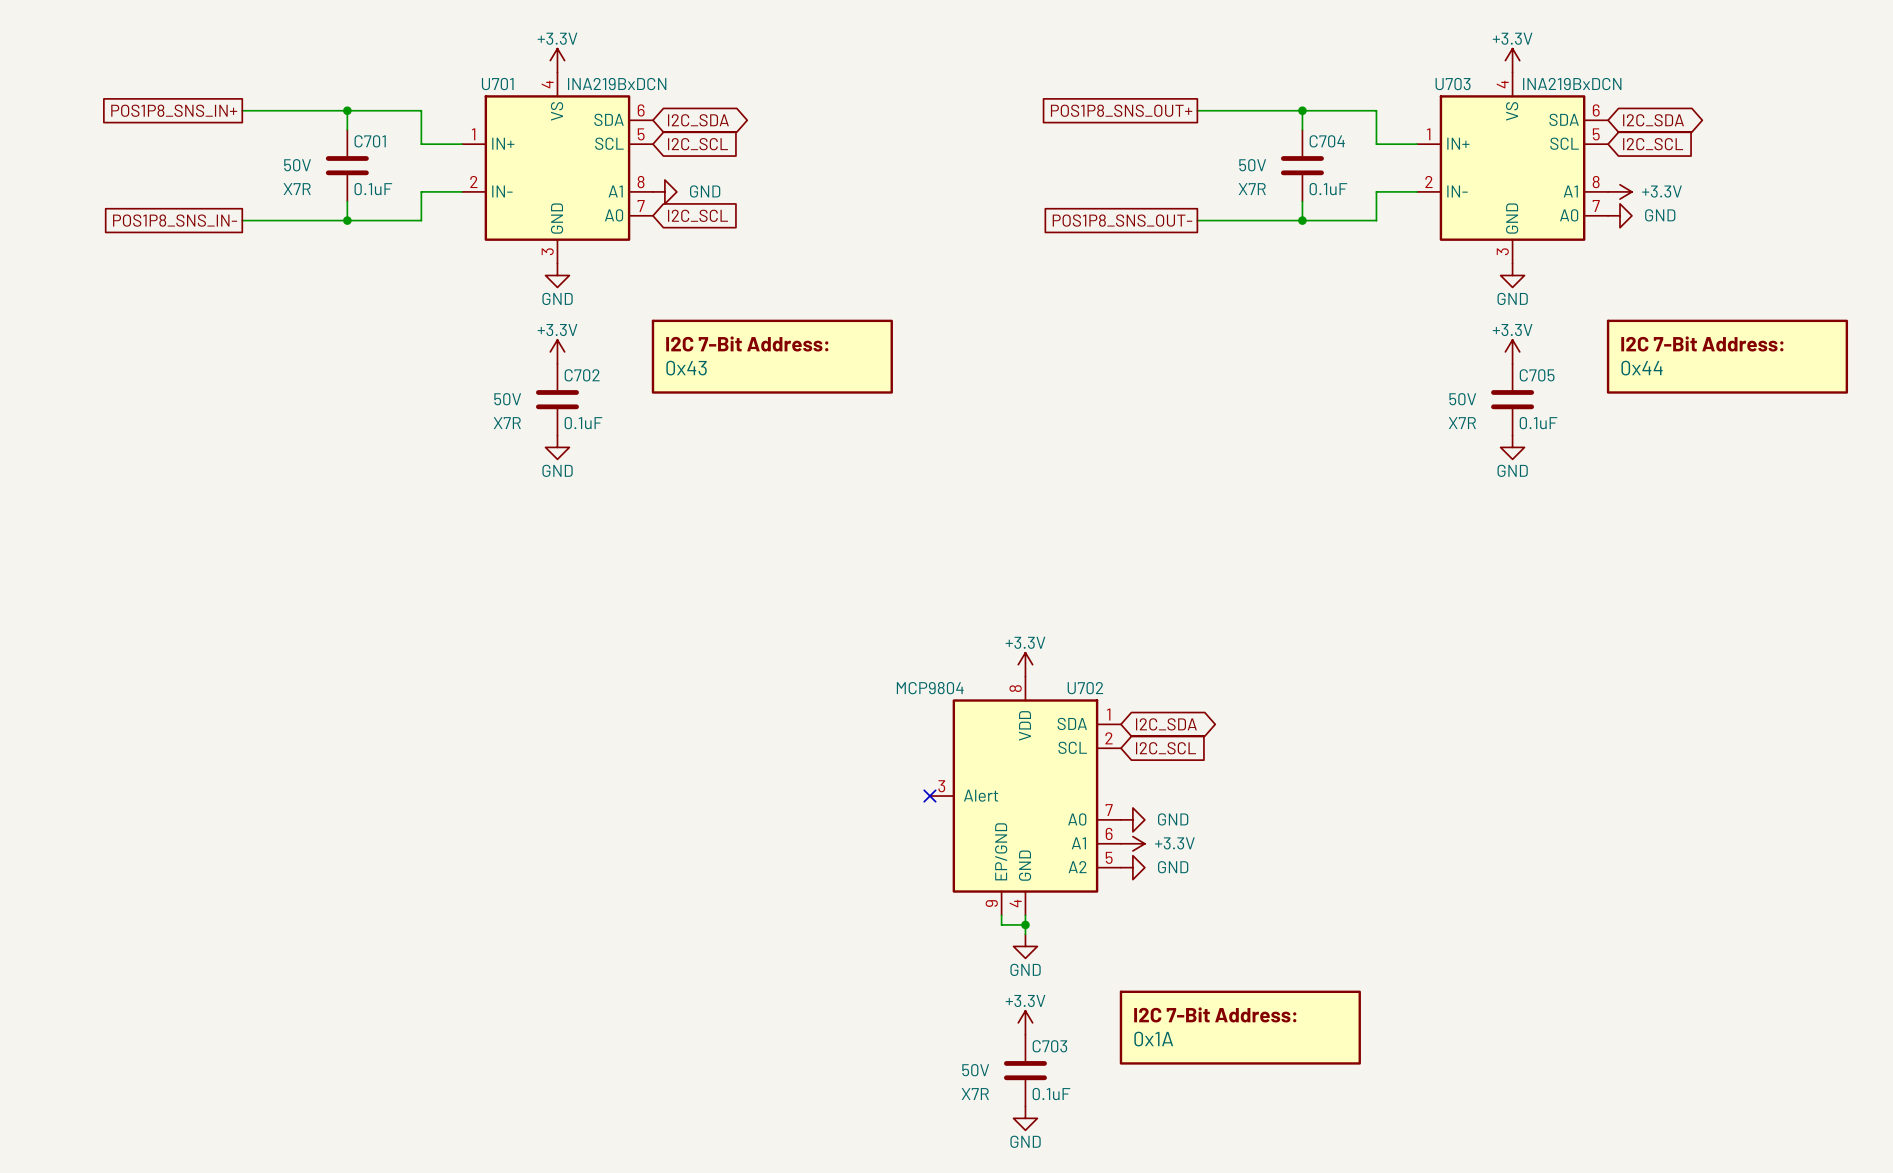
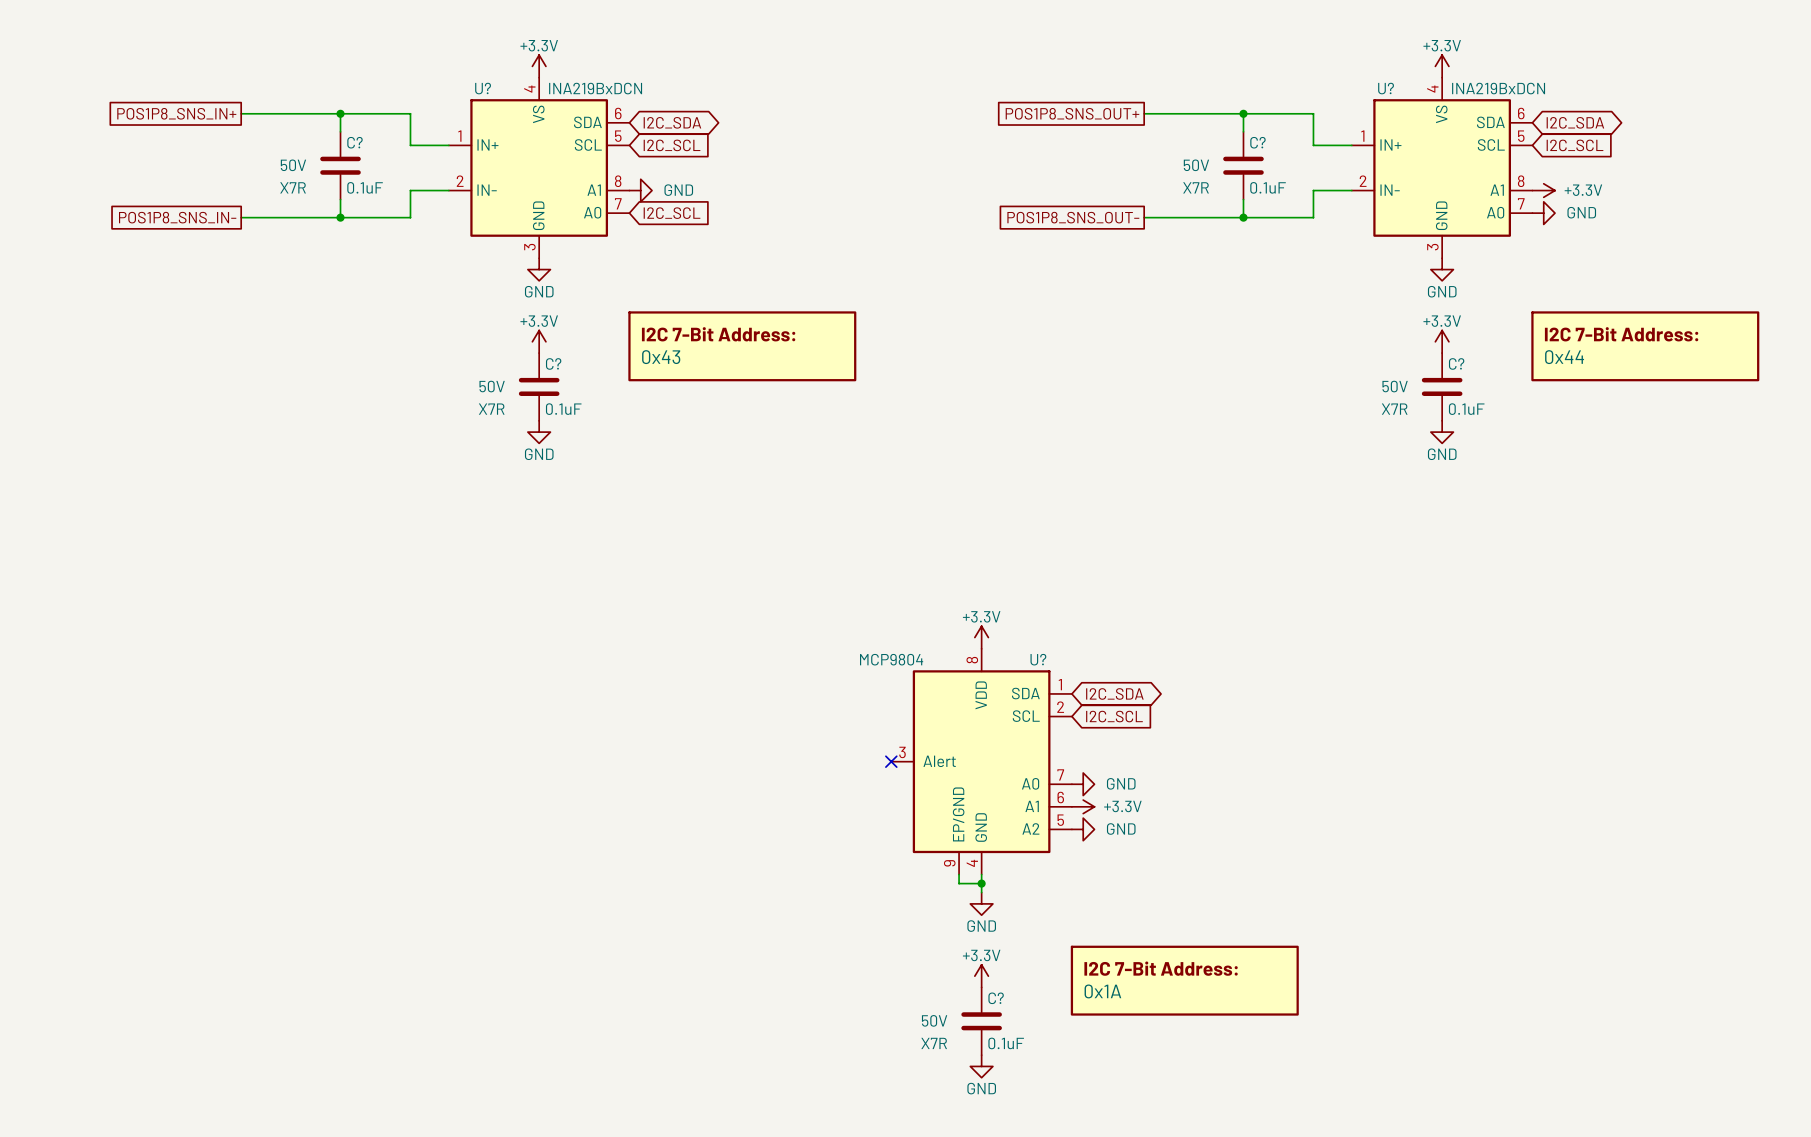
U701 name: U701 (497, 84) -> U? (483, 88)
U703 name: U703 (1453, 84) -> U? (1386, 88)
C701 name: C701 (370, 141) -> C? (354, 142)
C704 name: C704 (1327, 141) -> C? (1257, 142)
C702 name: C702 (582, 375) -> C? (553, 363)
C705 name: C705 (1537, 375) -> C? (1456, 363)
U702 name: U702 (1085, 688) -> U? (1038, 659)
C703 name: C703 (1049, 1046) -> C? (996, 998)

